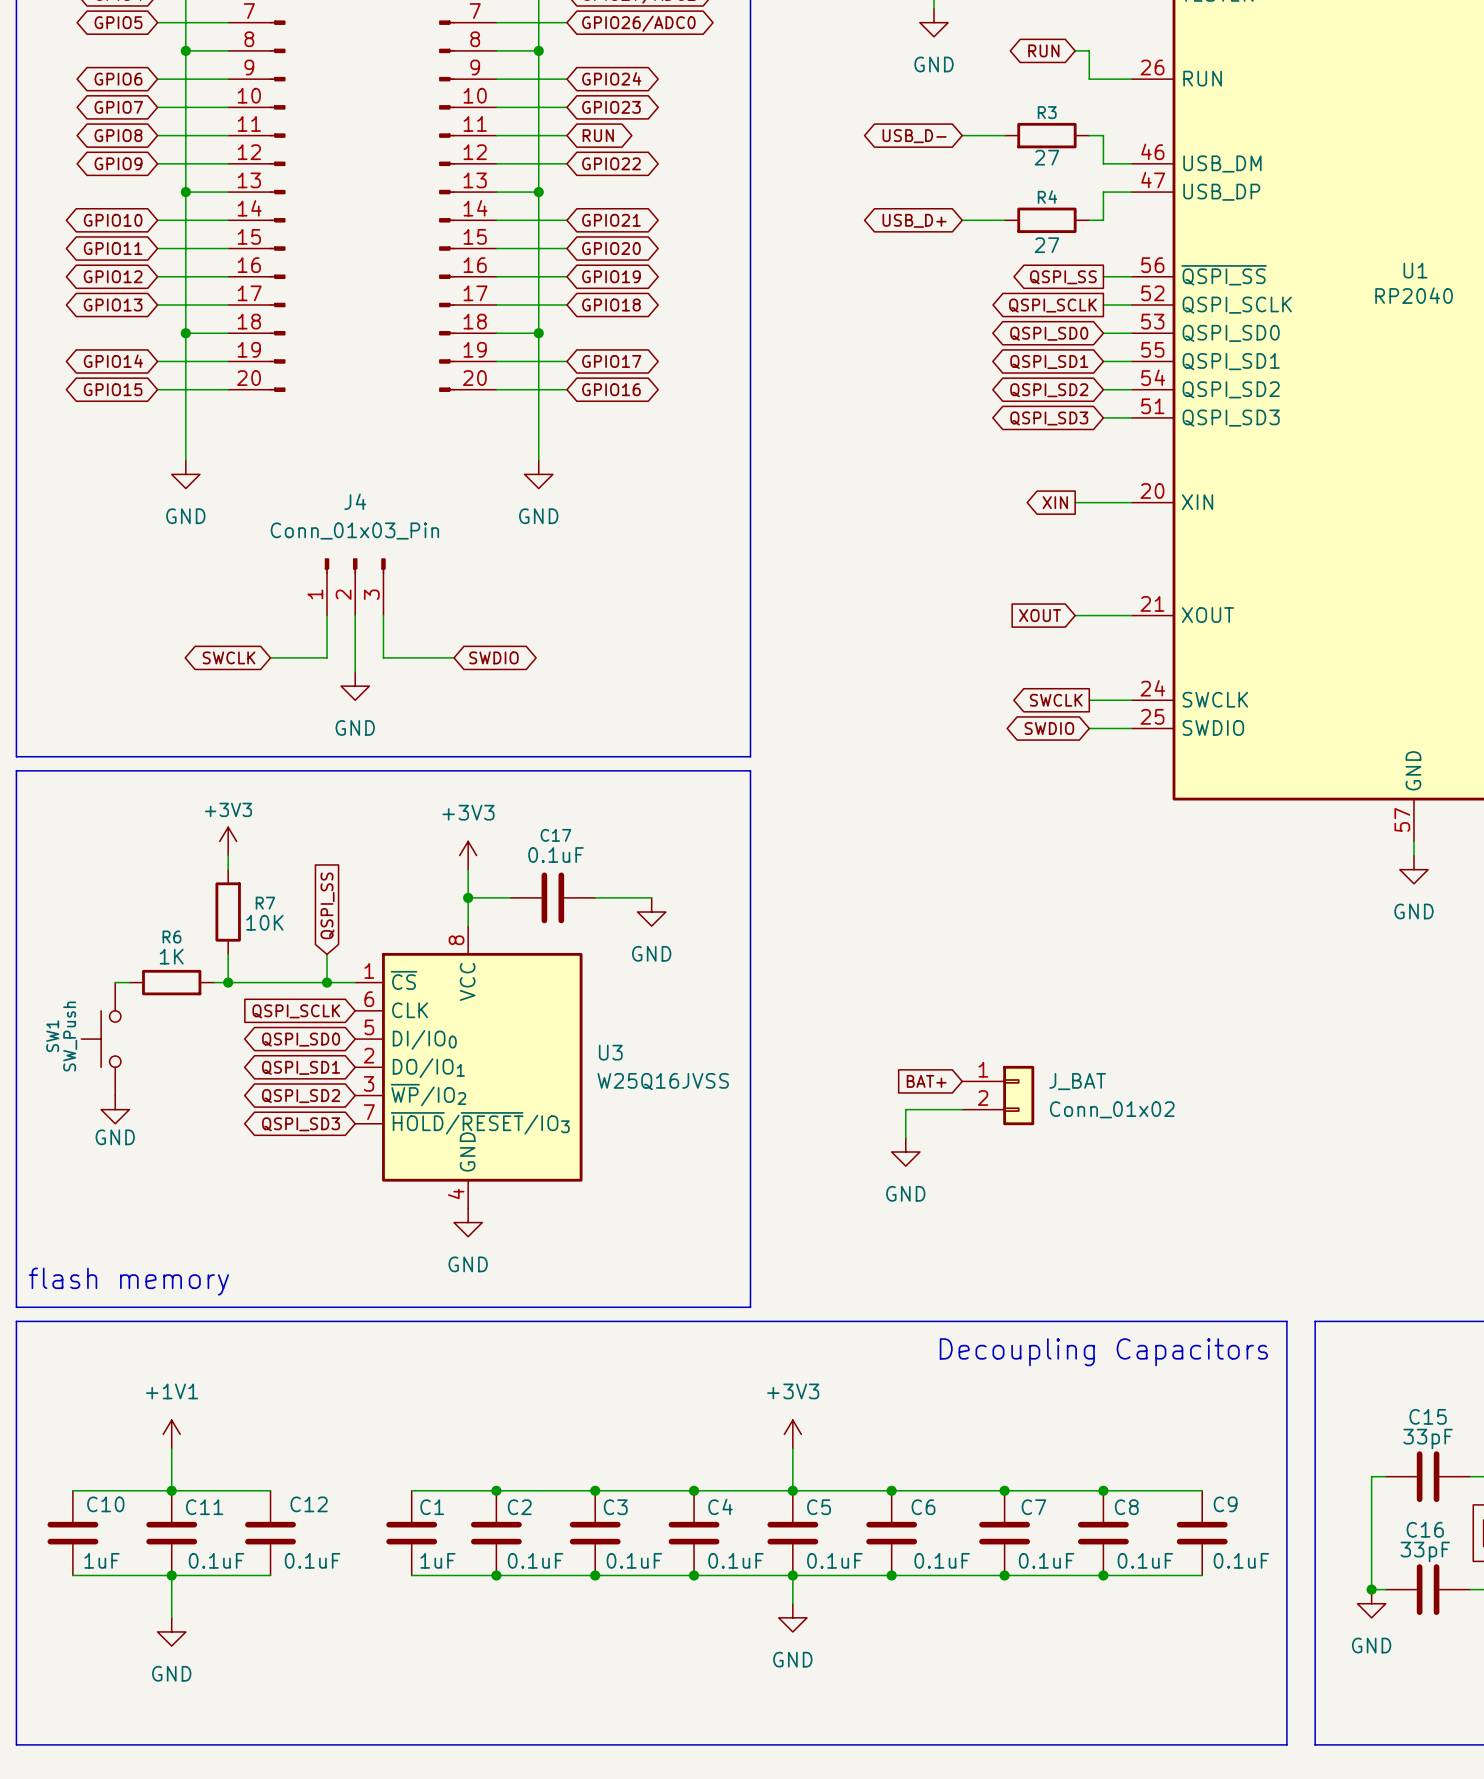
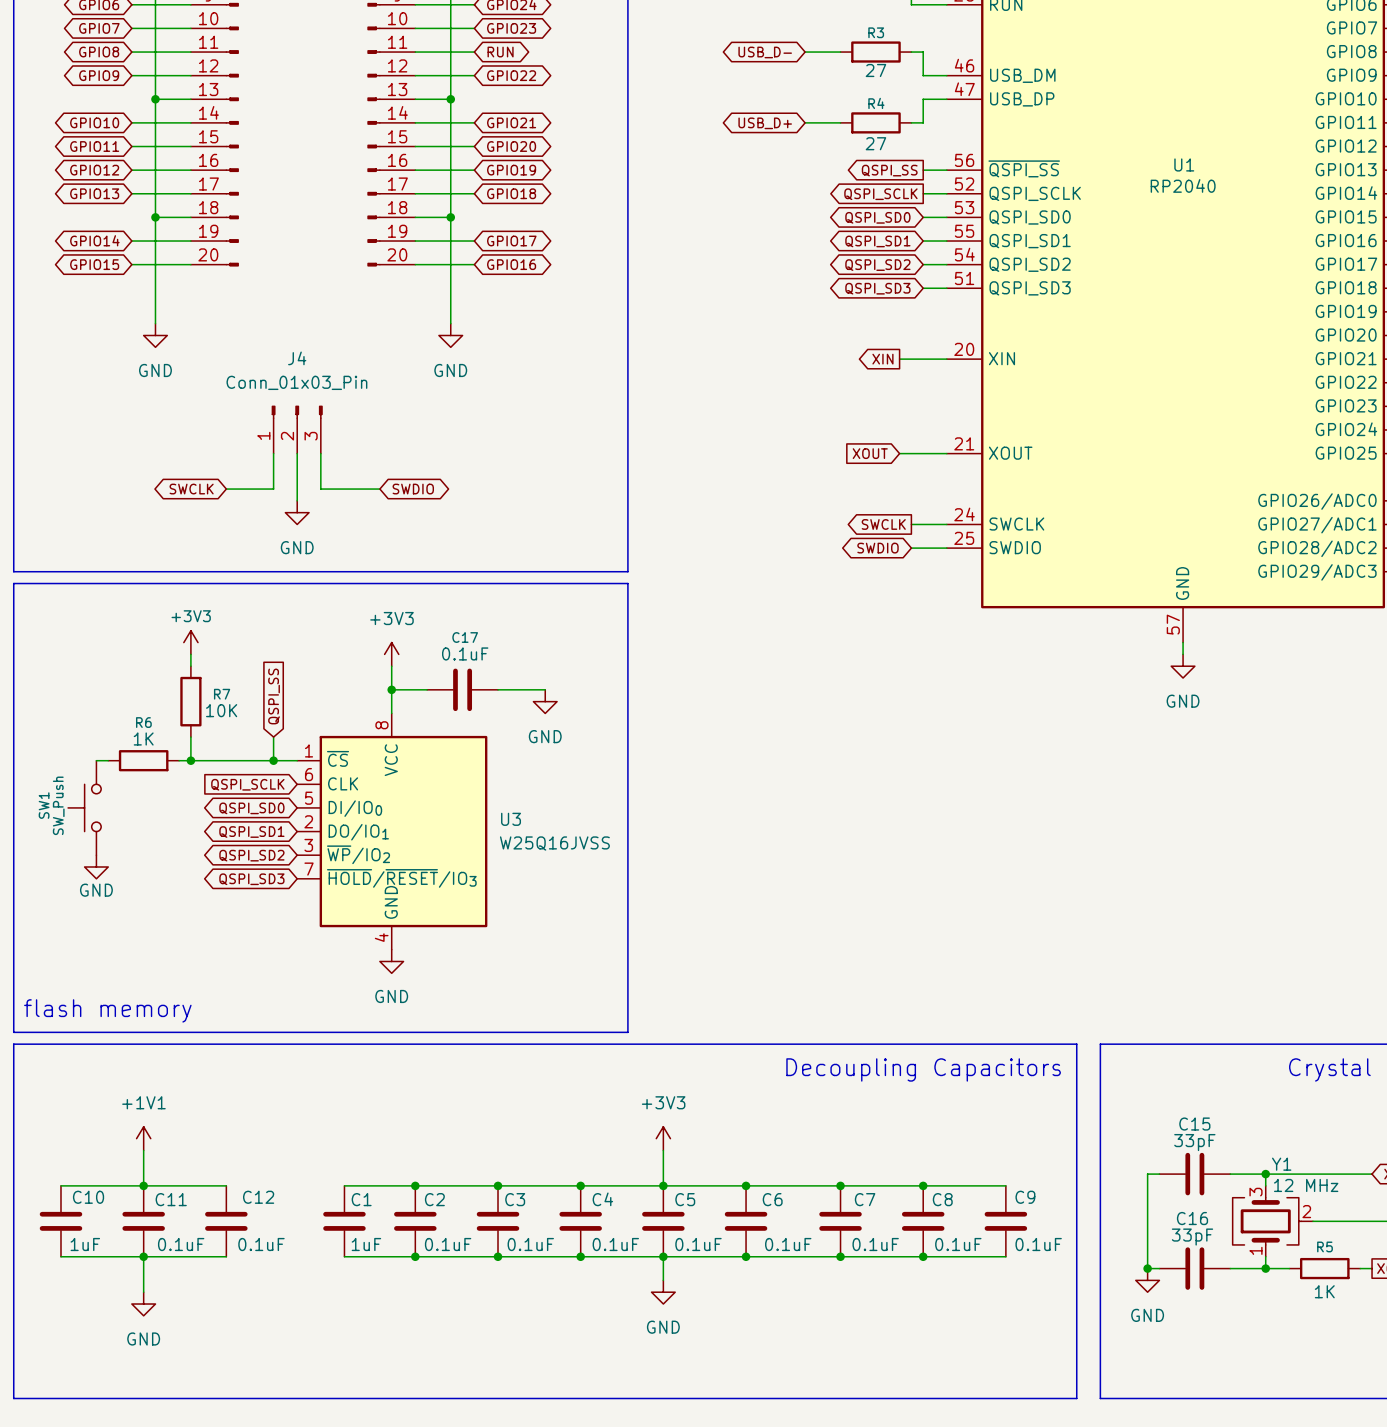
global label: BAT+ (926, 1081) -> none
J_BAT: Conn_01x02 (998, 1095) -> none
wire: (962, 1109) (905, 1109) (905, 1137) -> none
power symbol: GND (905, 1152) -> none

